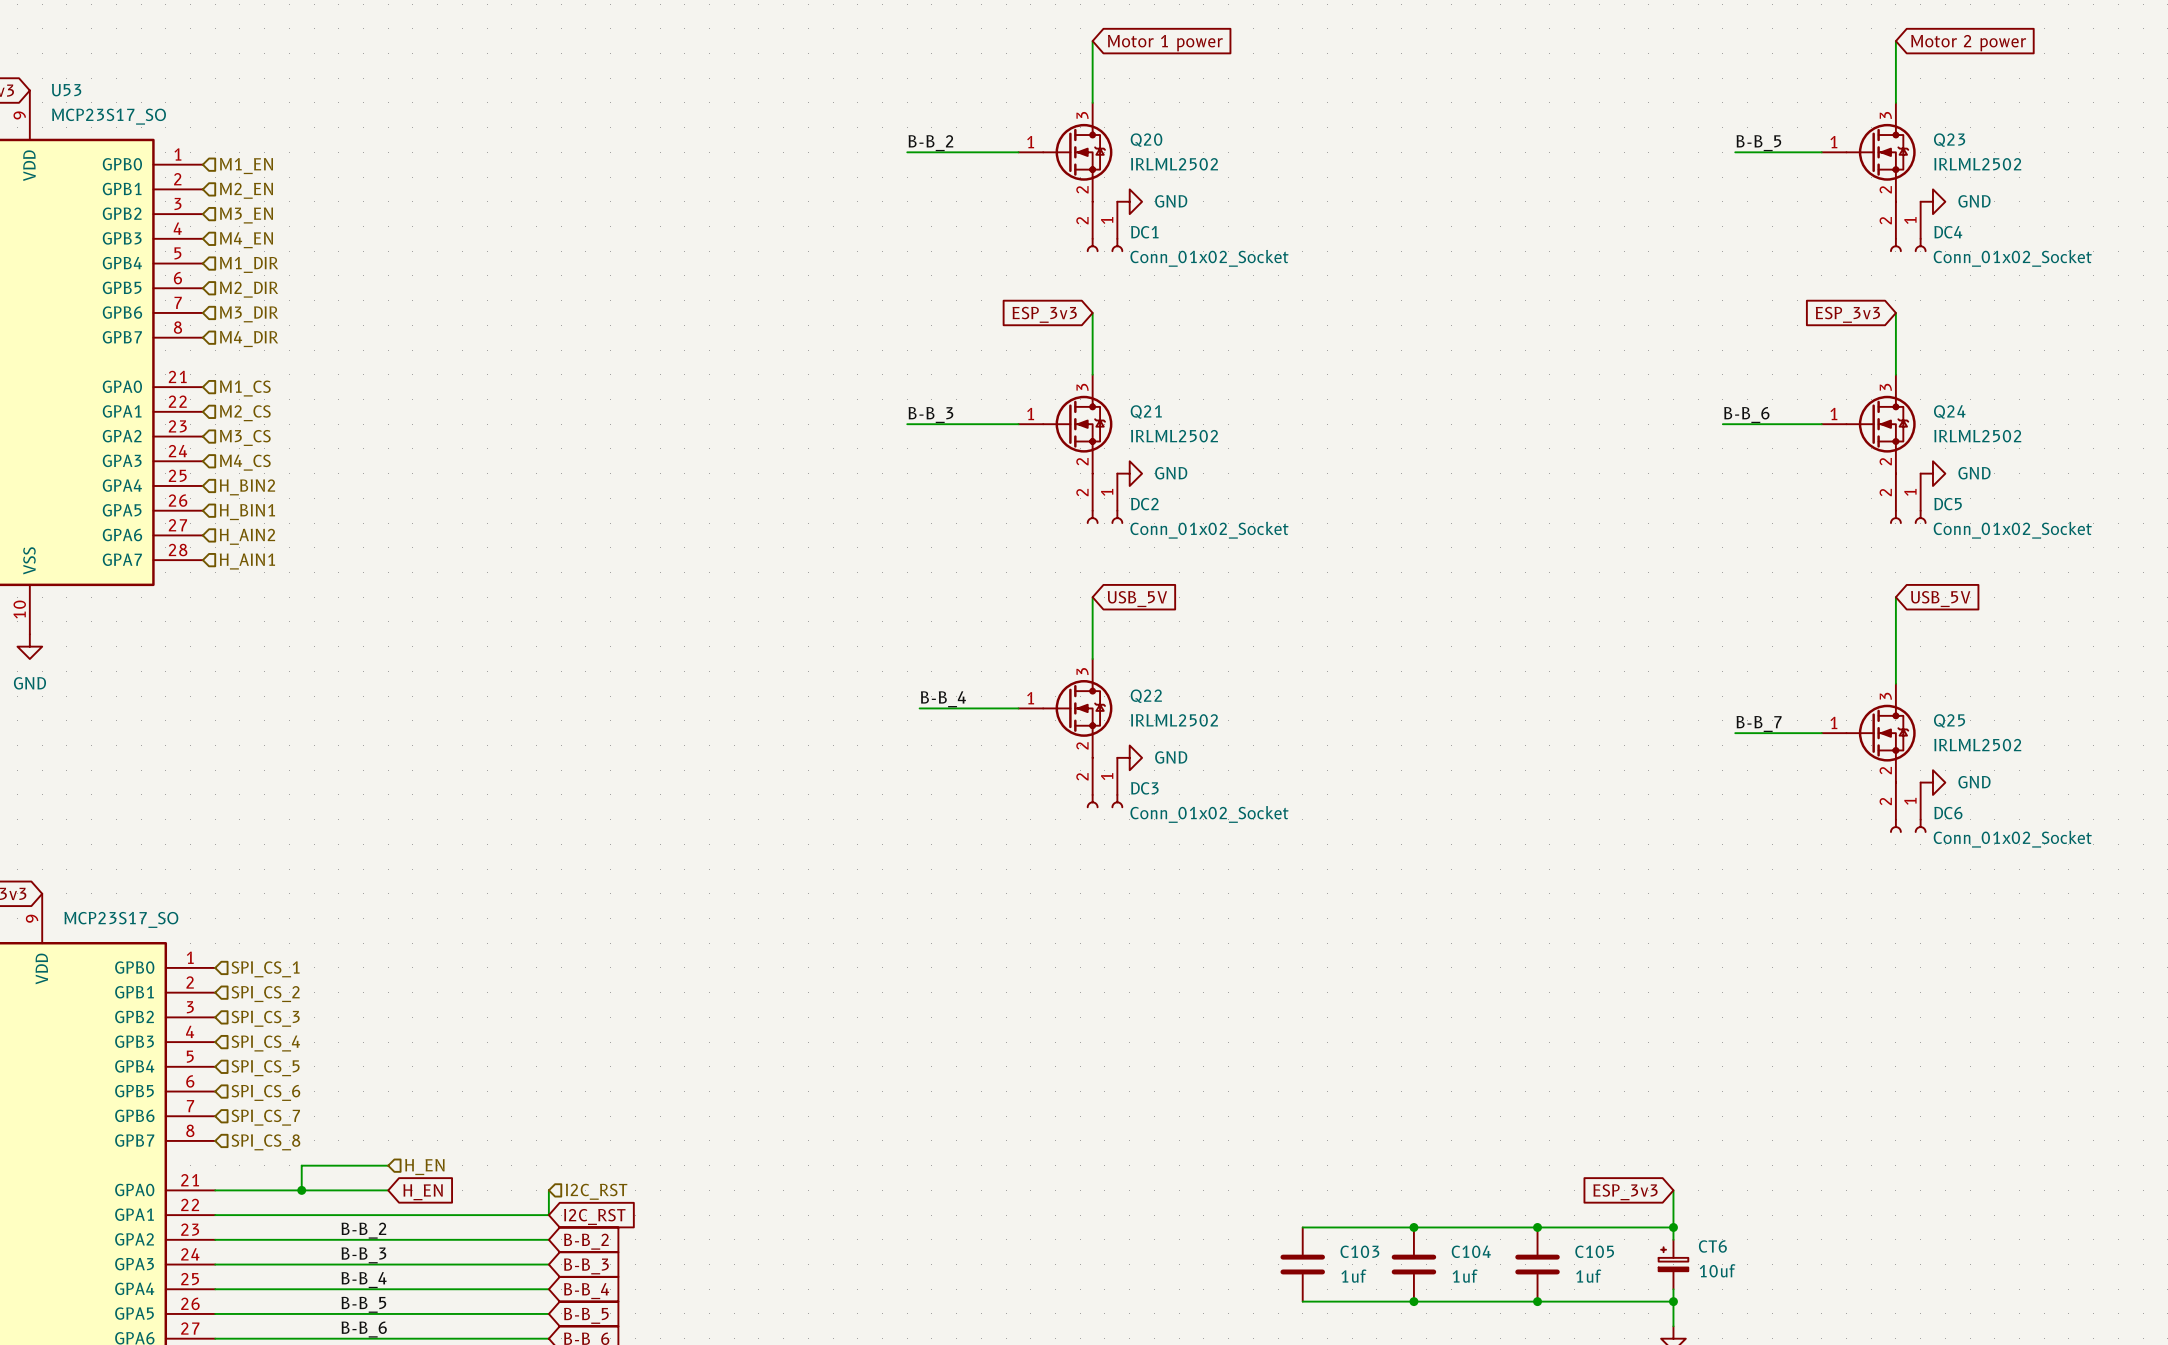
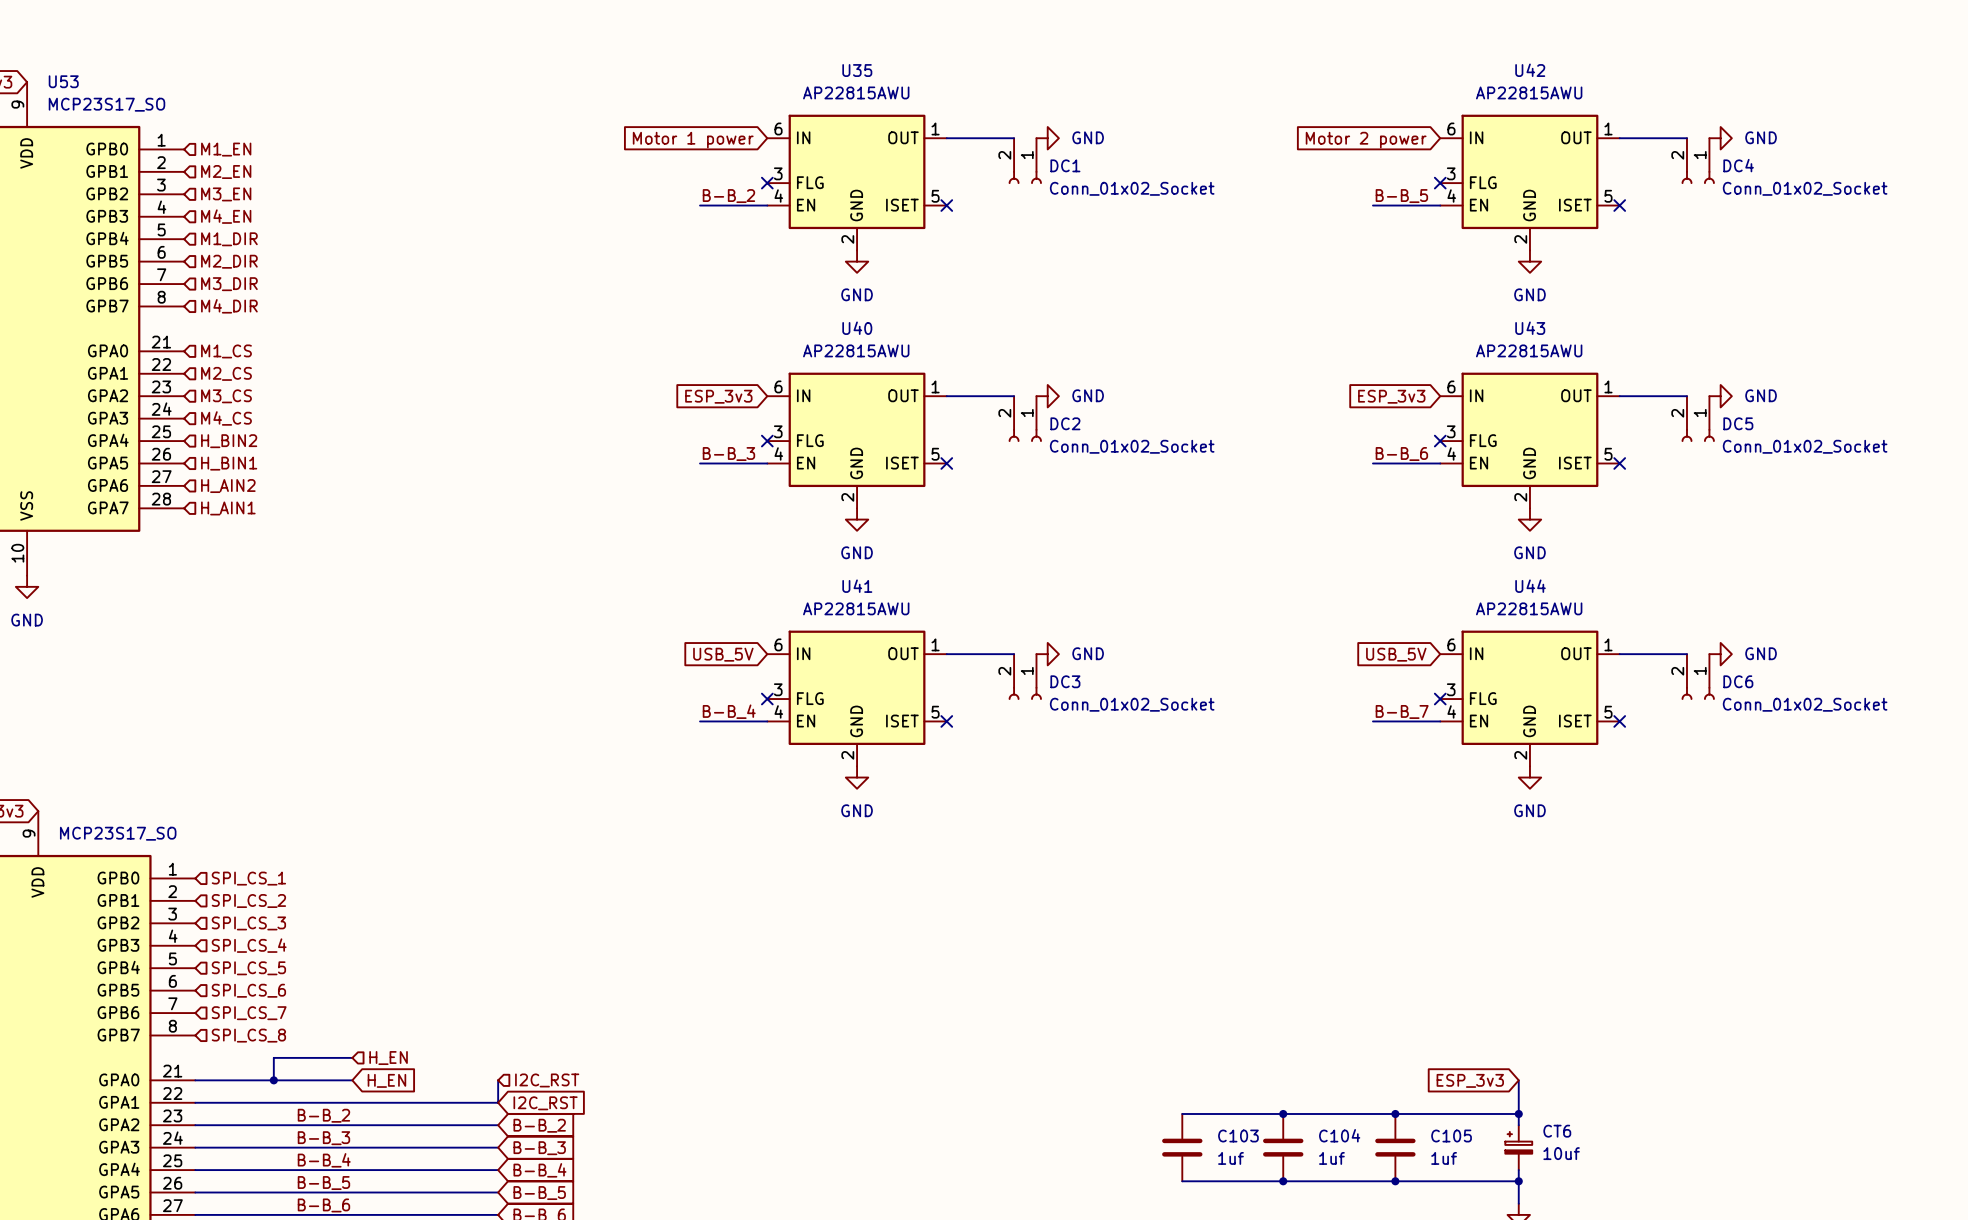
wire: (1092, 41) (1092, 102) -> none
wire: (1895, 41) (1895, 102) -> none
global label: Motor 1 power (1165, 43) -> none
global label: Motor 2 power (1968, 43) -> none
label position: B-B_2 (930, 143) -> B-B_2 (728, 196)
label position: B-B_5 (1758, 143) -> B-B_5 (1401, 196)
Q20: IRLML2502 (1065, 152) -> none
Q23: IRLML2502 (1868, 152) -> none
global label: none -> Motor 1 power (693, 140)
global label: none -> Motor 2 power (1366, 140)
no-connect mark: none -> (767, 183)
U35: none -> AP22815AWU (857, 182)
power symbol position: GND (1129, 201) -> GND (1047, 138)
no-connect mark: none -> (1440, 183)
U42: none -> AP22815AWU (1529, 182)
power symbol position: GND (1932, 201) -> GND (1720, 138)
wire: none -> (700, 205) (767, 205)
no-connect mark: none -> (946, 205)
DC1 position: (1104, 226) -> (1025, 161)
wire: none -> (1372, 205) (1440, 205)
no-connect mark: none -> (1619, 205)
DC4 position: (1908, 226) -> (1698, 161)
power symbol: none -> GND (857, 261)
power symbol: none -> GND (1529, 261)
wire: (1092, 312) (1092, 374) -> none
wire: (1895, 312) (1895, 374) -> none
global label: ESP_3v3 (1044, 314) -> none
global label: ESP_3v3 (1847, 314) -> none
label position: B-B_3 (930, 415) -> B-B_3 (728, 454)
label position: B-B_6 (1746, 415) -> B-B_6 (1401, 454)
Q21: IRLML2502 (1065, 424) -> none
wire: (1722, 424) (1821, 424) -> none
Q24: IRLML2502 (1868, 424) -> none
wire: none -> (946, 396) (1014, 396)
wire: none -> (1619, 396) (1686, 396)
global label: none -> ESP_3v3 (718, 396)
global label: none -> ESP_3v3 (1391, 396)
power symbol position: GND (1129, 473) -> GND (1047, 396)
power symbol position: GND (1932, 473) -> GND (1720, 396)
no-connect mark: none -> (767, 441)
U40: none -> AP22815AWU (857, 440)
no-connect mark: none -> (1440, 441)
U43: none -> AP22815AWU (1529, 440)
DC2 position: (1104, 498) -> (1025, 418)
DC5 position: (1908, 498) -> (1698, 418)
wire: none -> (700, 463) (767, 463)
no-connect mark: none -> (946, 463)
wire: none -> (1372, 463) (1440, 463)
no-connect mark: none -> (1619, 463)
power symbol: none -> GND (857, 519)
power symbol: none -> GND (1529, 519)
wire: (1092, 597) (1092, 659) -> none
wire: (1895, 597) (1895, 683) -> none
global label: USB_5V (1137, 599) -> none
global label: USB_5V (1940, 599) -> none
label position: B-B_4 (943, 699) -> B-B_4 (729, 711)
Q22: IRLML2502 (1065, 708) -> none
wire: none -> (946, 654) (1014, 654)
wire: none -> (1619, 654) (1686, 654)
global label: none -> USB_5V (723, 654)
global label: none -> USB_5V (1396, 654)
label position: B-B_7 (1759, 724) -> B-B_7 (1402, 711)
wire: (1735, 733) (1821, 733) -> none
Q25: IRLML2502 (1868, 733) -> none
power symbol position: GND (1129, 757) -> GND (1047, 654)
U41: none -> AP22815AWU (857, 698)
U44: none -> AP22815AWU (1529, 698)
no-connect mark: none -> (767, 699)
no-connect mark: none -> (1440, 699)
DC3 position: (1104, 782) -> (1025, 676)
power symbol position: GND (1932, 782) -> GND (1720, 654)
wire: none -> (700, 721) (767, 721)
no-connect mark: none -> (946, 721)
wire: none -> (1372, 721) (1440, 721)
no-connect mark: none -> (1619, 721)
DC6 position: (1908, 807) -> (1698, 676)
power symbol: none -> GND (857, 777)
power symbol: none -> GND (1529, 777)

